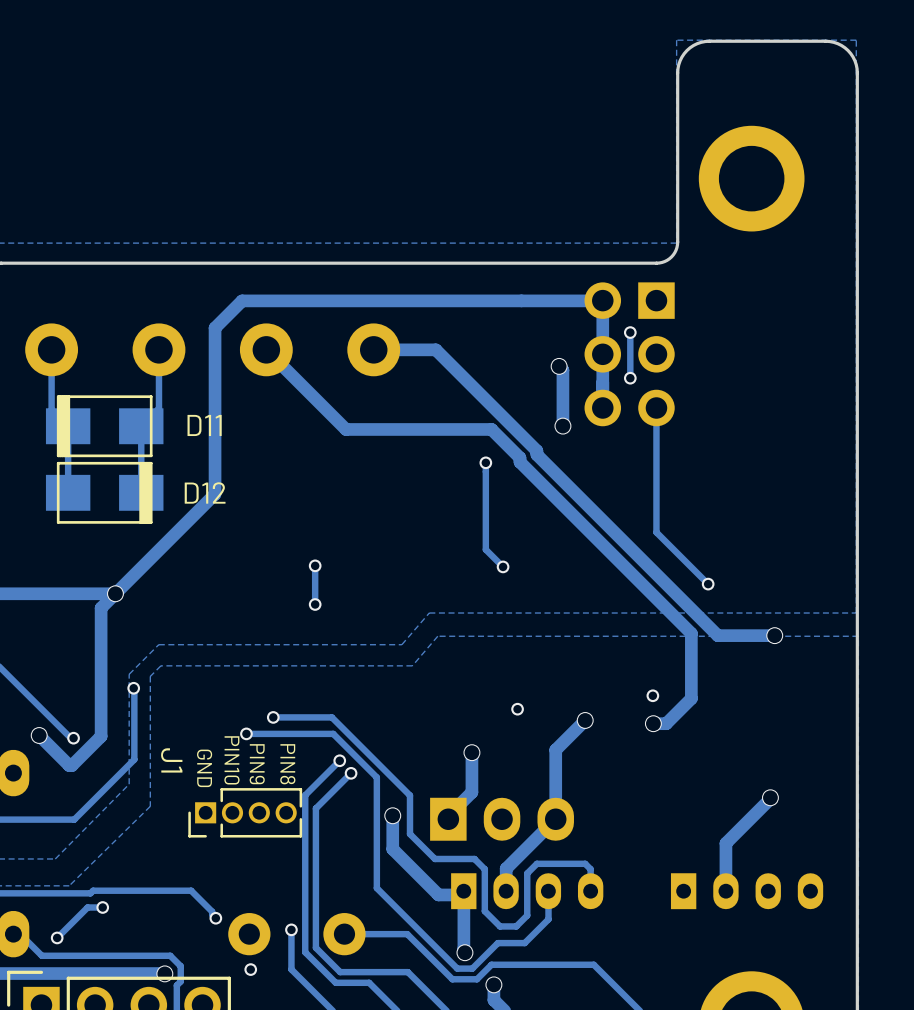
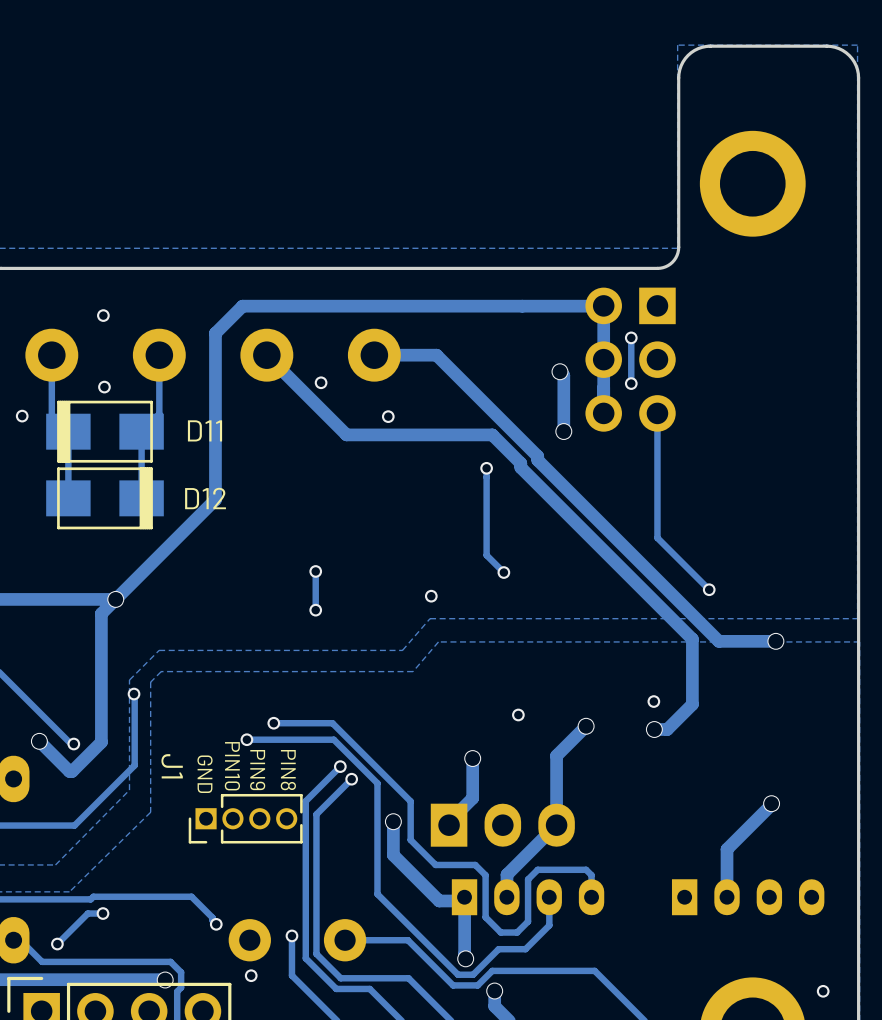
via: none -> (103, 315)
via: none -> (321, 382)
via: none -> (104, 387)
via: none -> (22, 416)
via: none -> (388, 416)
via: none -> (431, 596)
via: none -> (823, 991)

